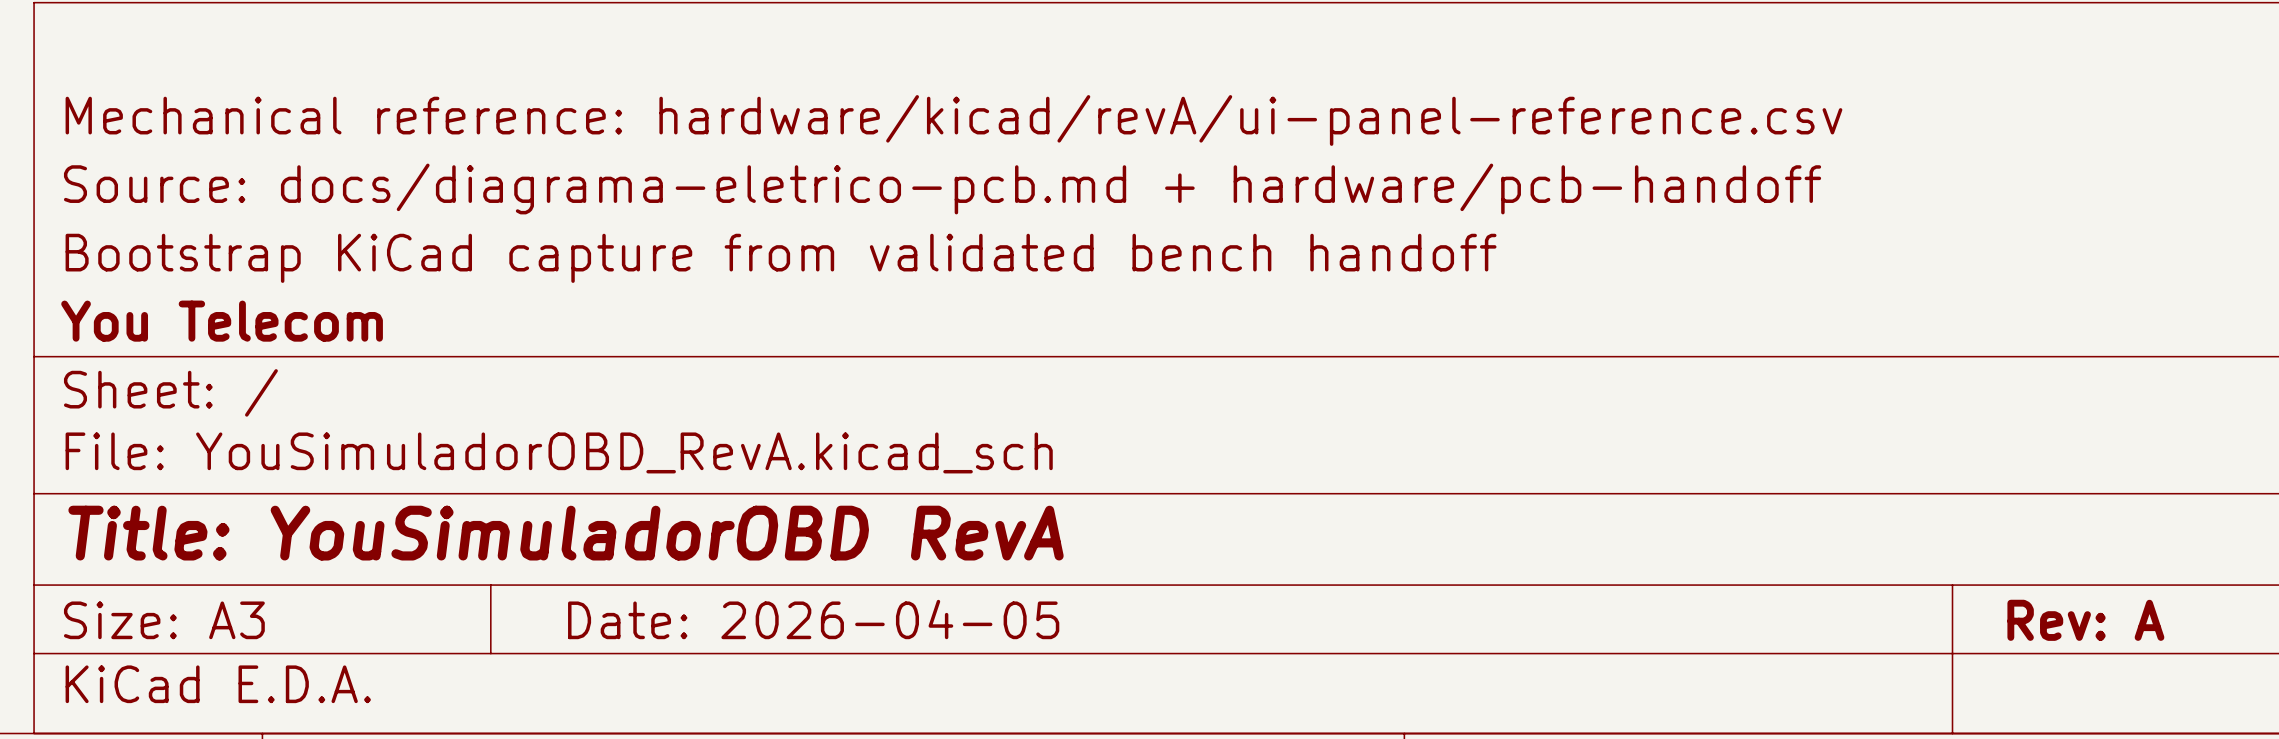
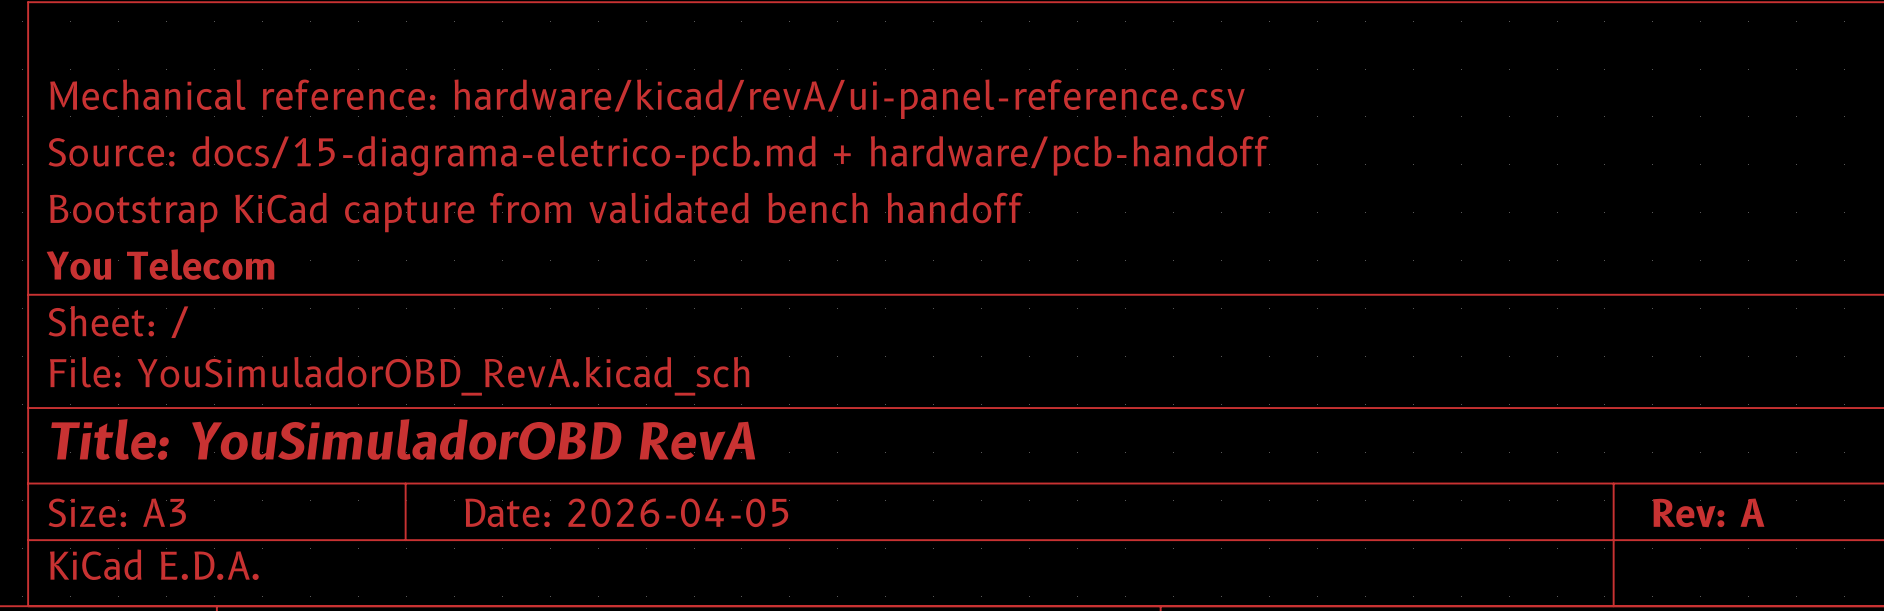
title block: Source: docs/diagrama-eletrico-pcb.md + hardware/pcb-handoff (942, 188) -> Source: docs/15-diagrama-eletrico-pcb.md + hardware/pcb-handoff (658, 156)

